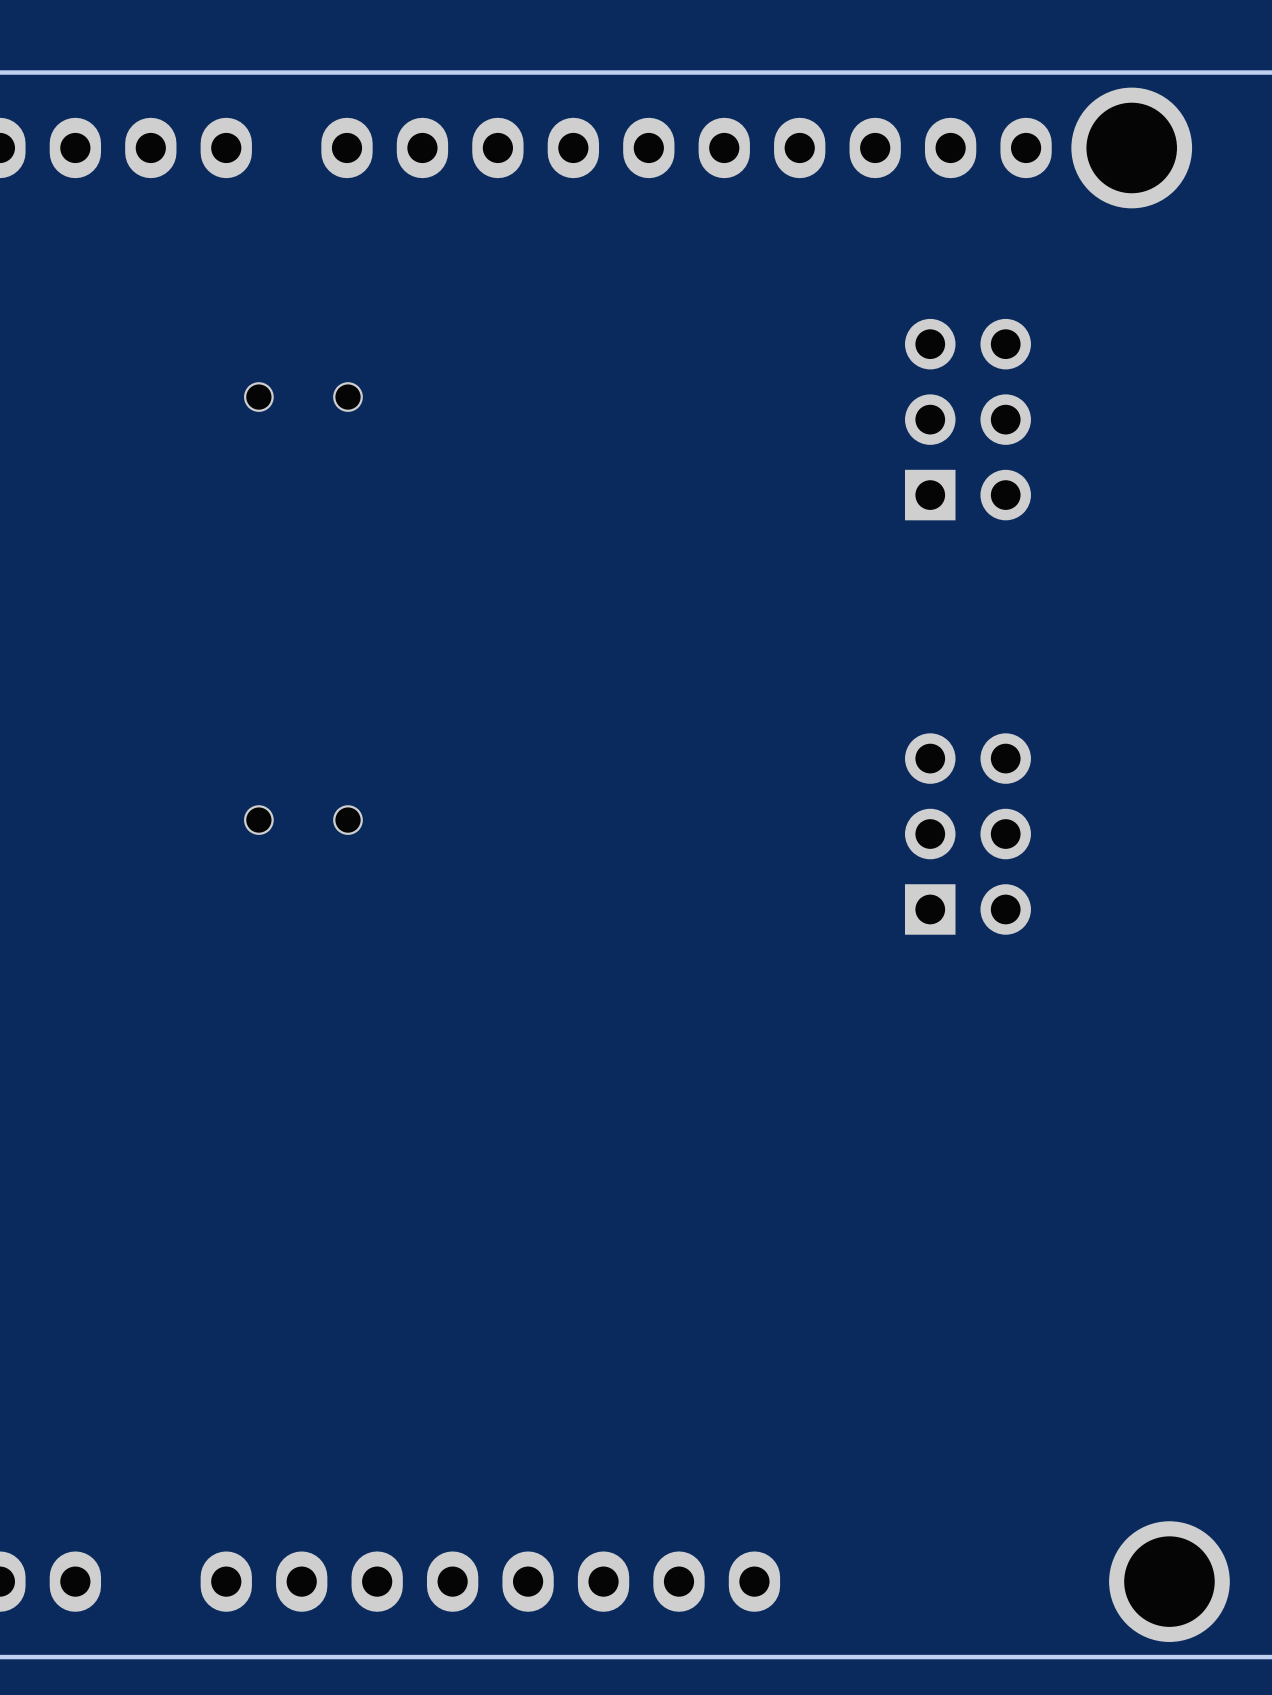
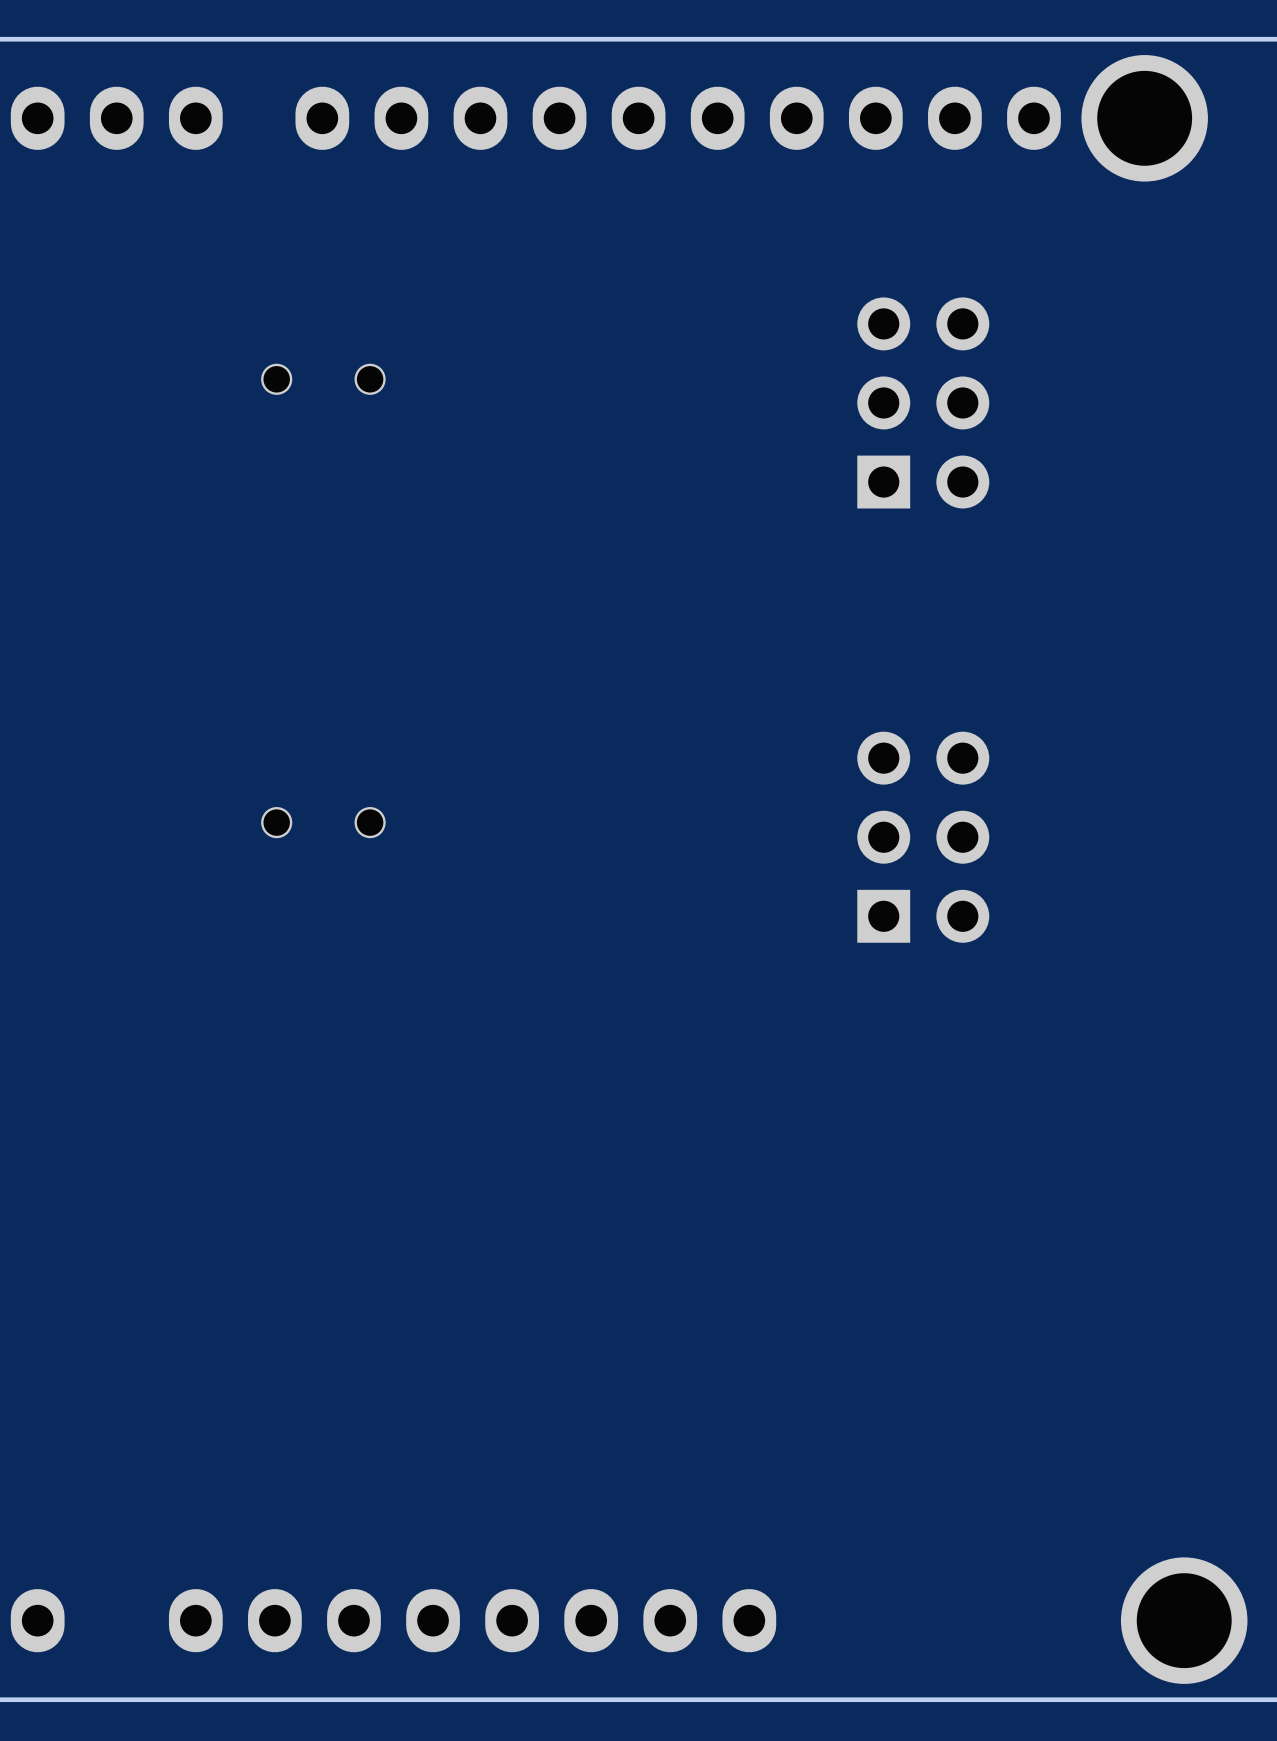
part position: (303, 397) -> (323, 379)
part position: (967, 419) -> (923, 402)
part position: (303, 820) -> (323, 822)
part position: (967, 834) -> (923, 837)

